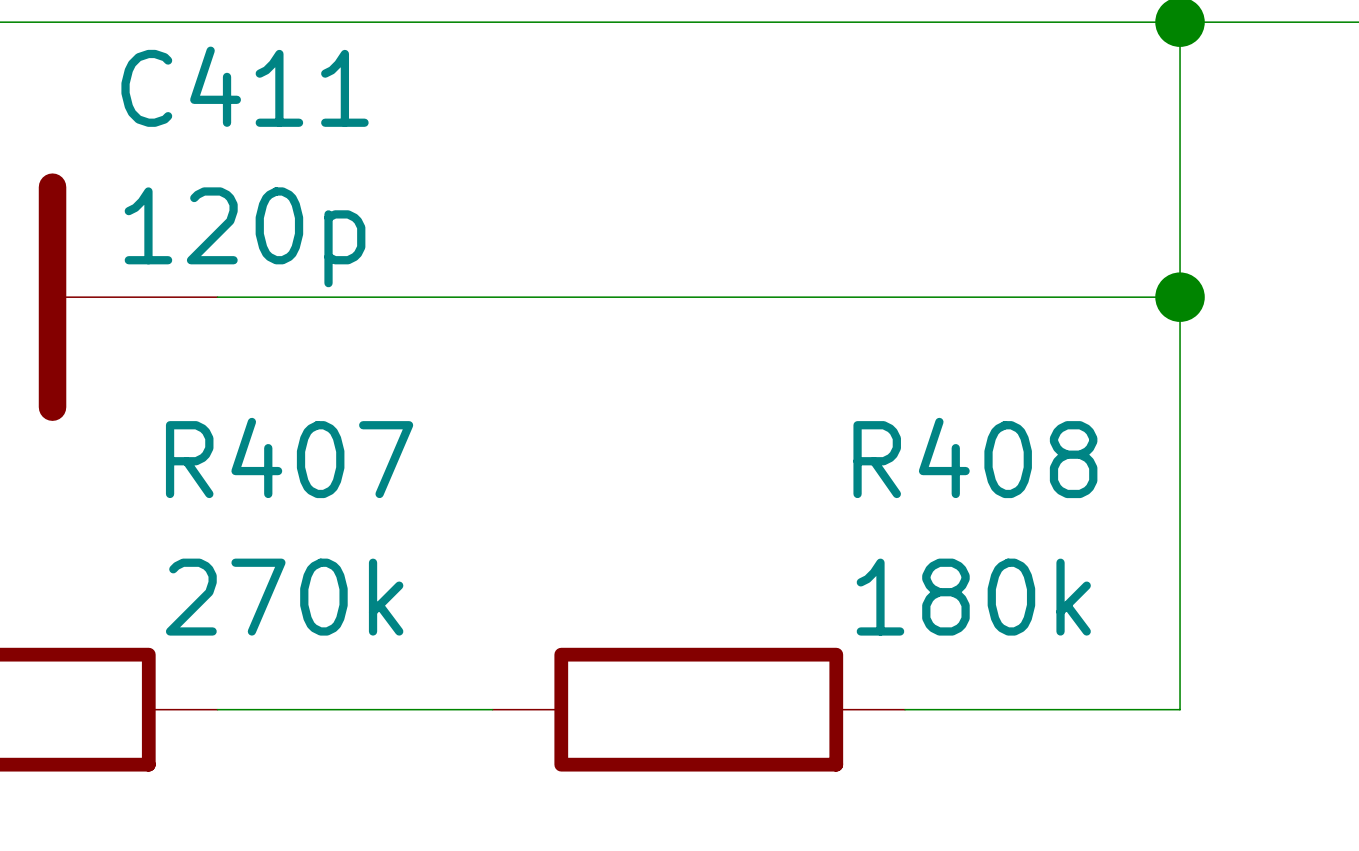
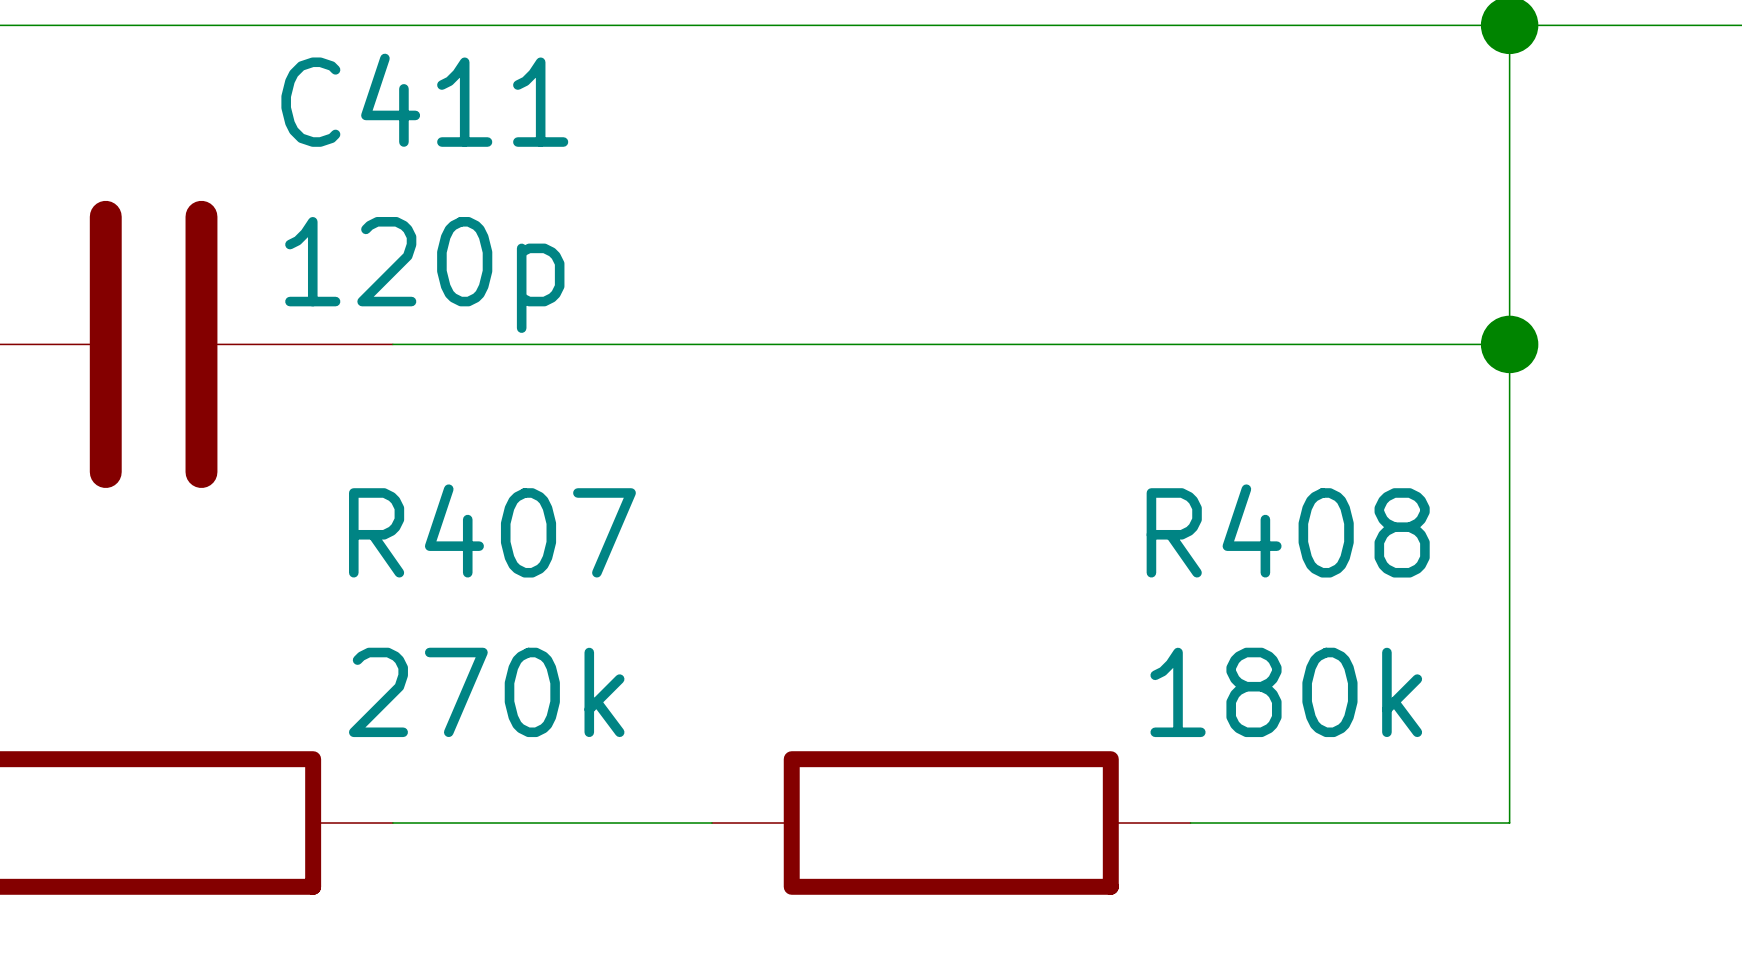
R407 name position: R407 (289, 457) -> R407 (492, 530)
R408 name position: R408 (975, 457) -> R408 (1288, 530)
R407 value position: 270k (284, 597) -> 270k (486, 692)
R408 value position: 180k (973, 597) -> 180k (1286, 692)

